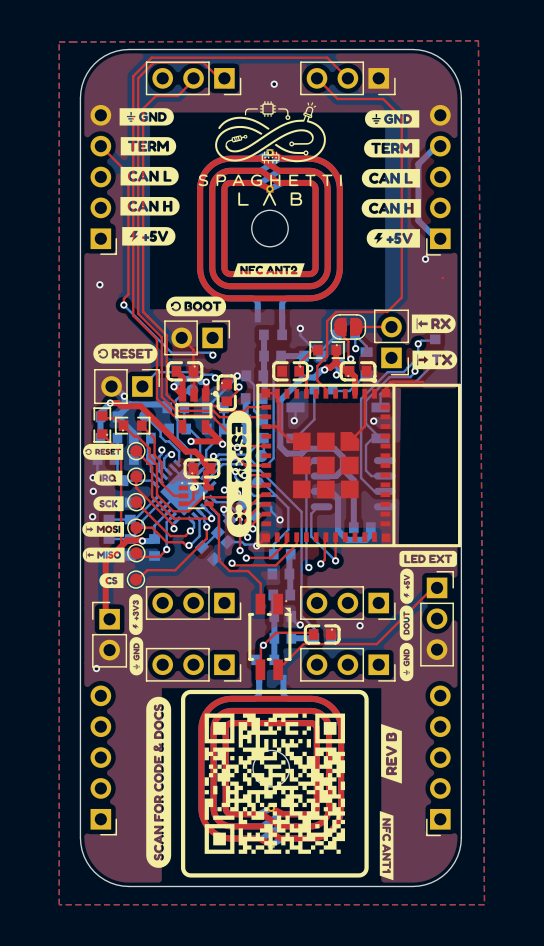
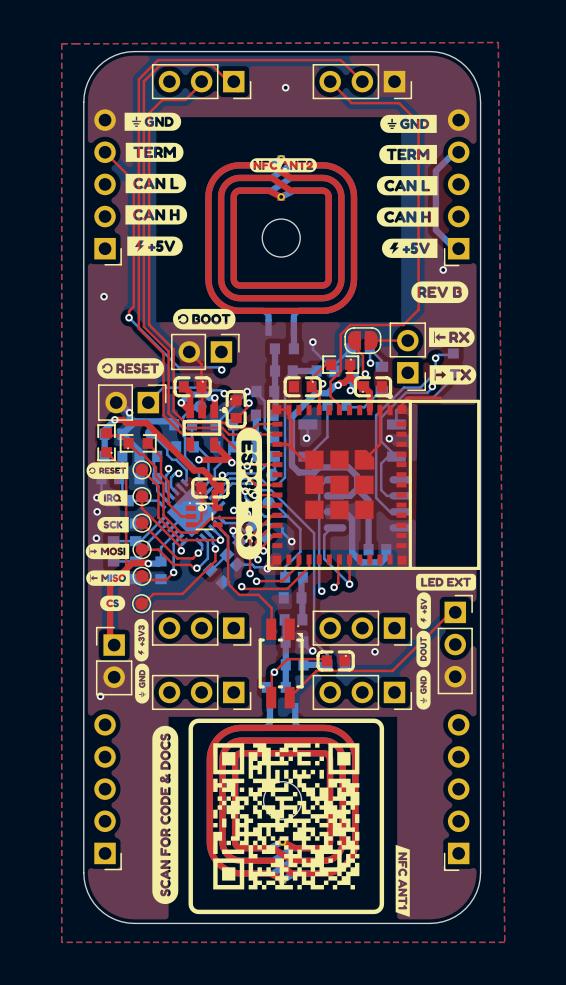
drawing: [198, 101, 342, 206] -> none
drawing: none -> [249, 158, 317, 173]
drawing: [233, 263, 305, 277] -> none
drawing: none -> [411, 281, 469, 304]
drawing shape: [99, 573, 124, 589] -> [100, 595, 126, 612]
drawing: [381, 723, 402, 784] -> none

